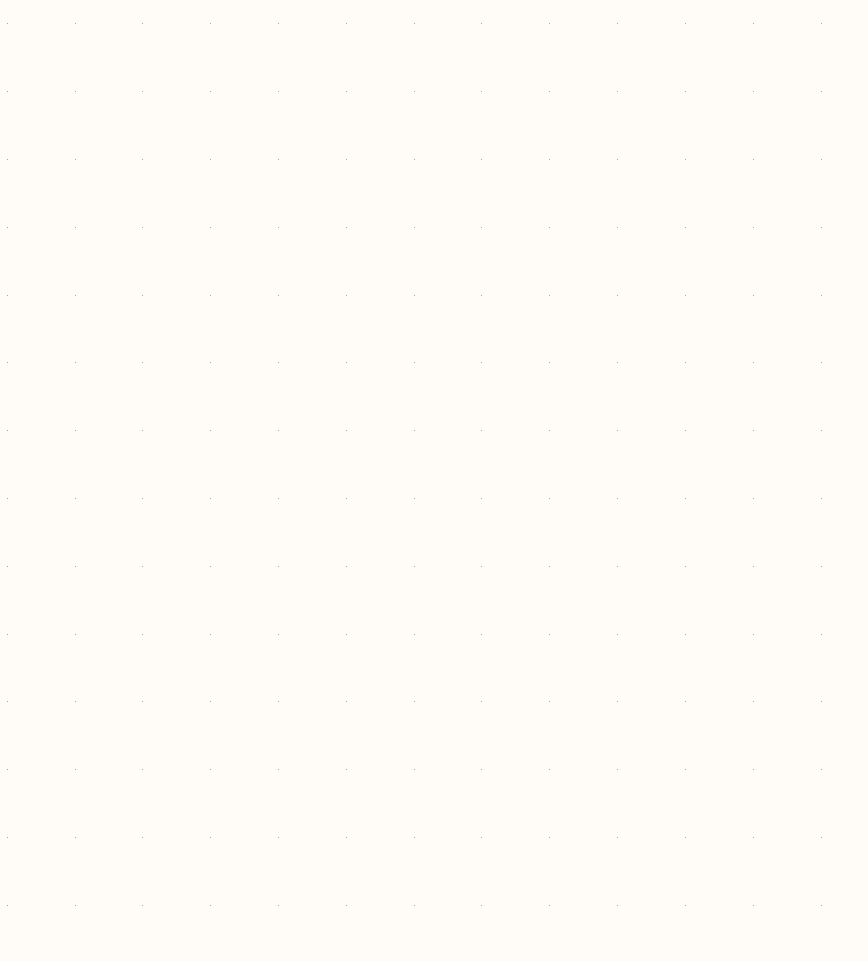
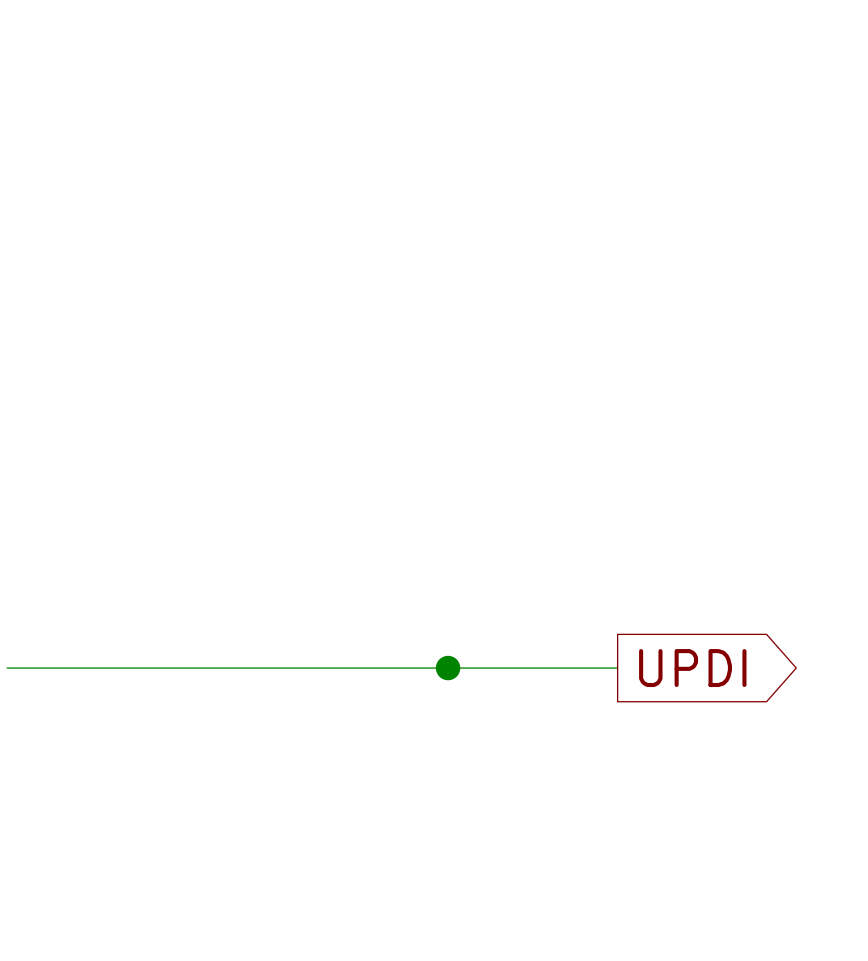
wire: none -> (7, 668) (617, 668)
junction: none -> (448, 668)
global label: none -> UPDI (692, 668)

